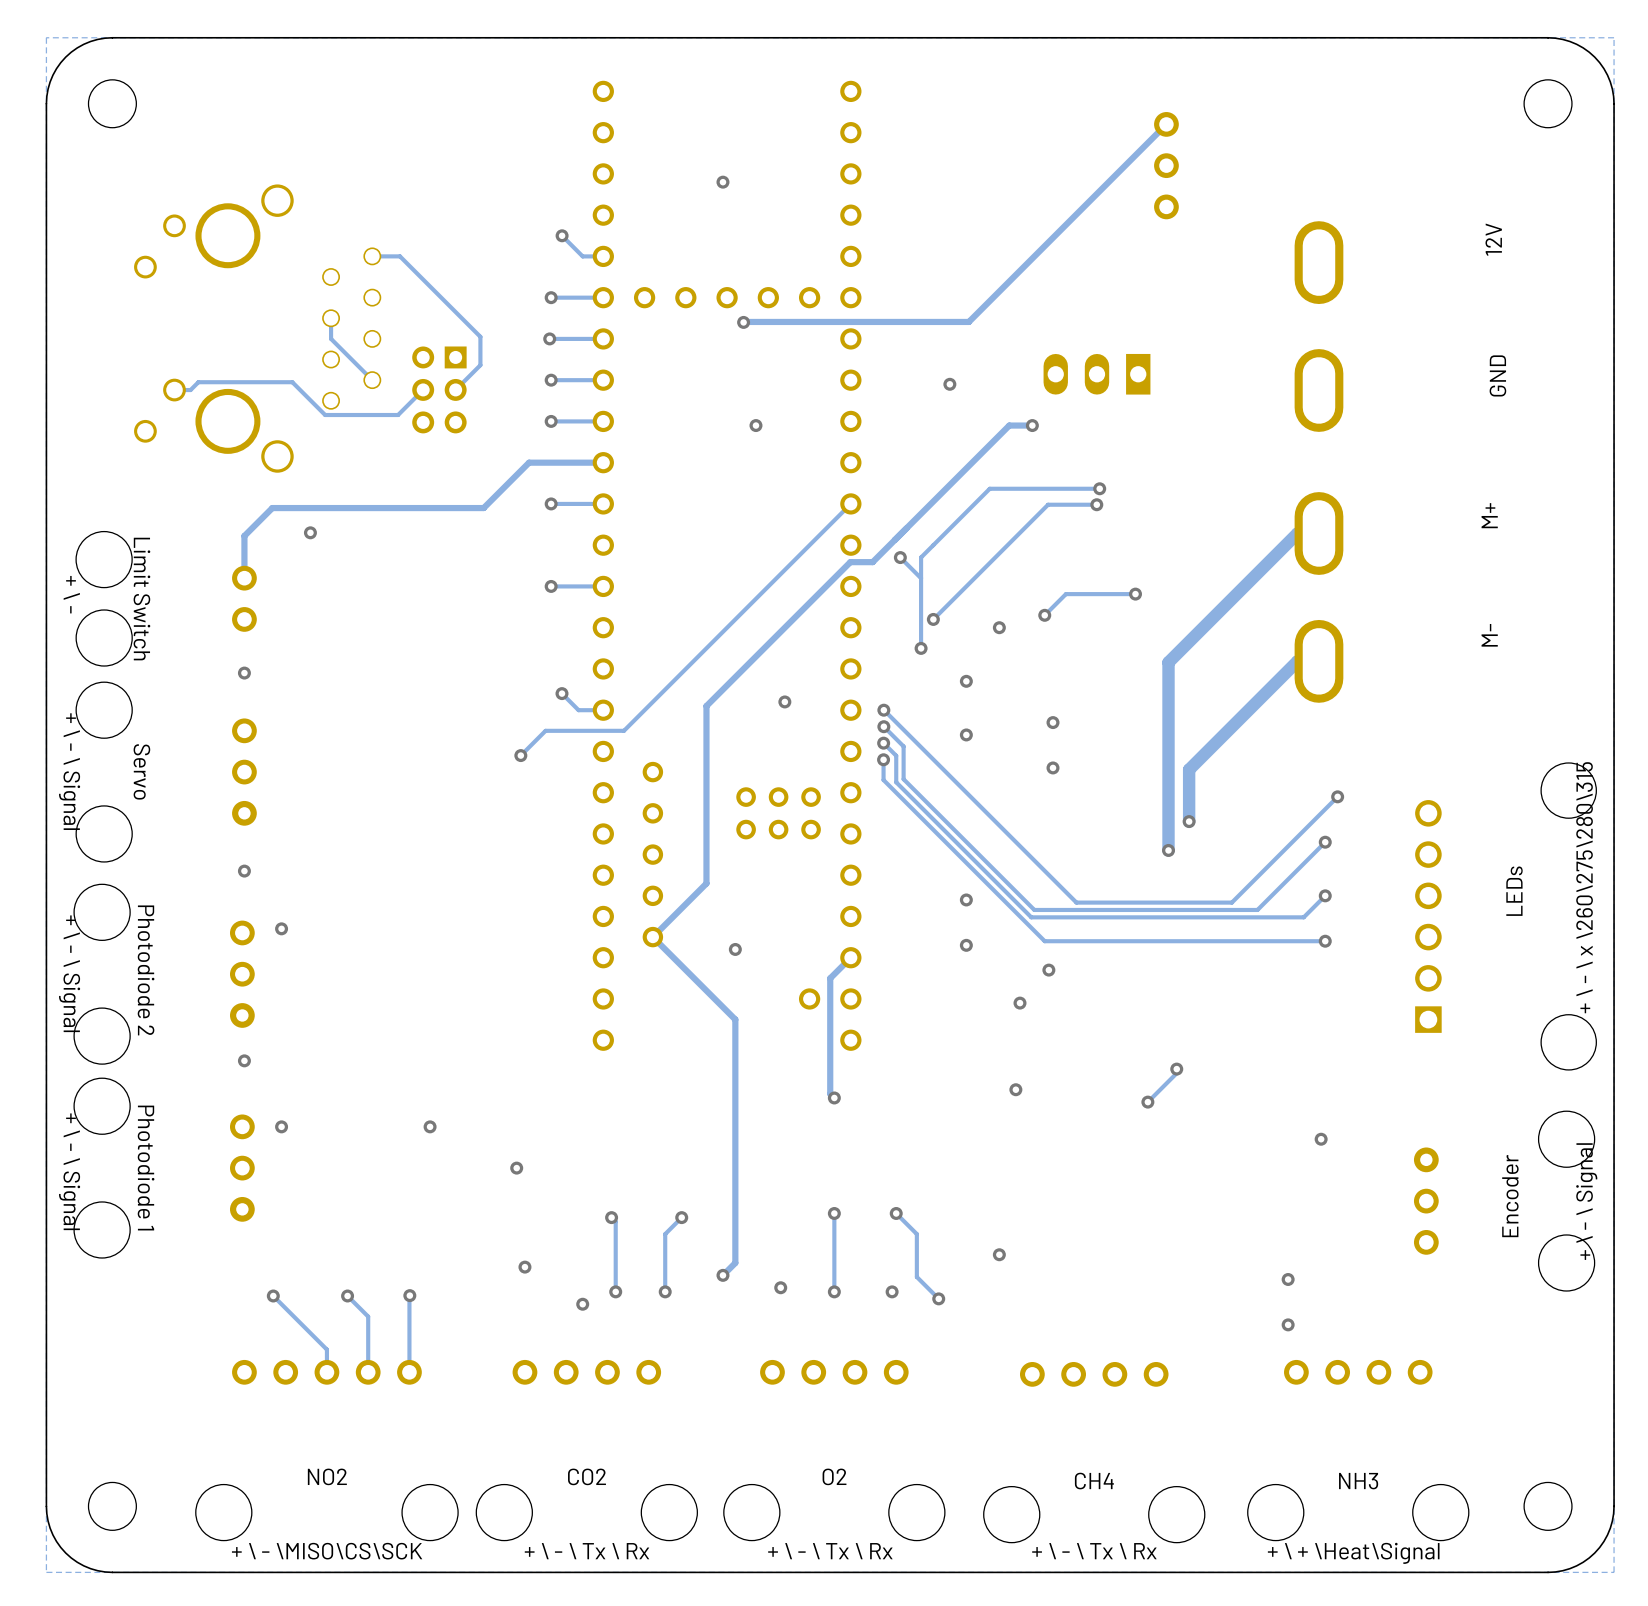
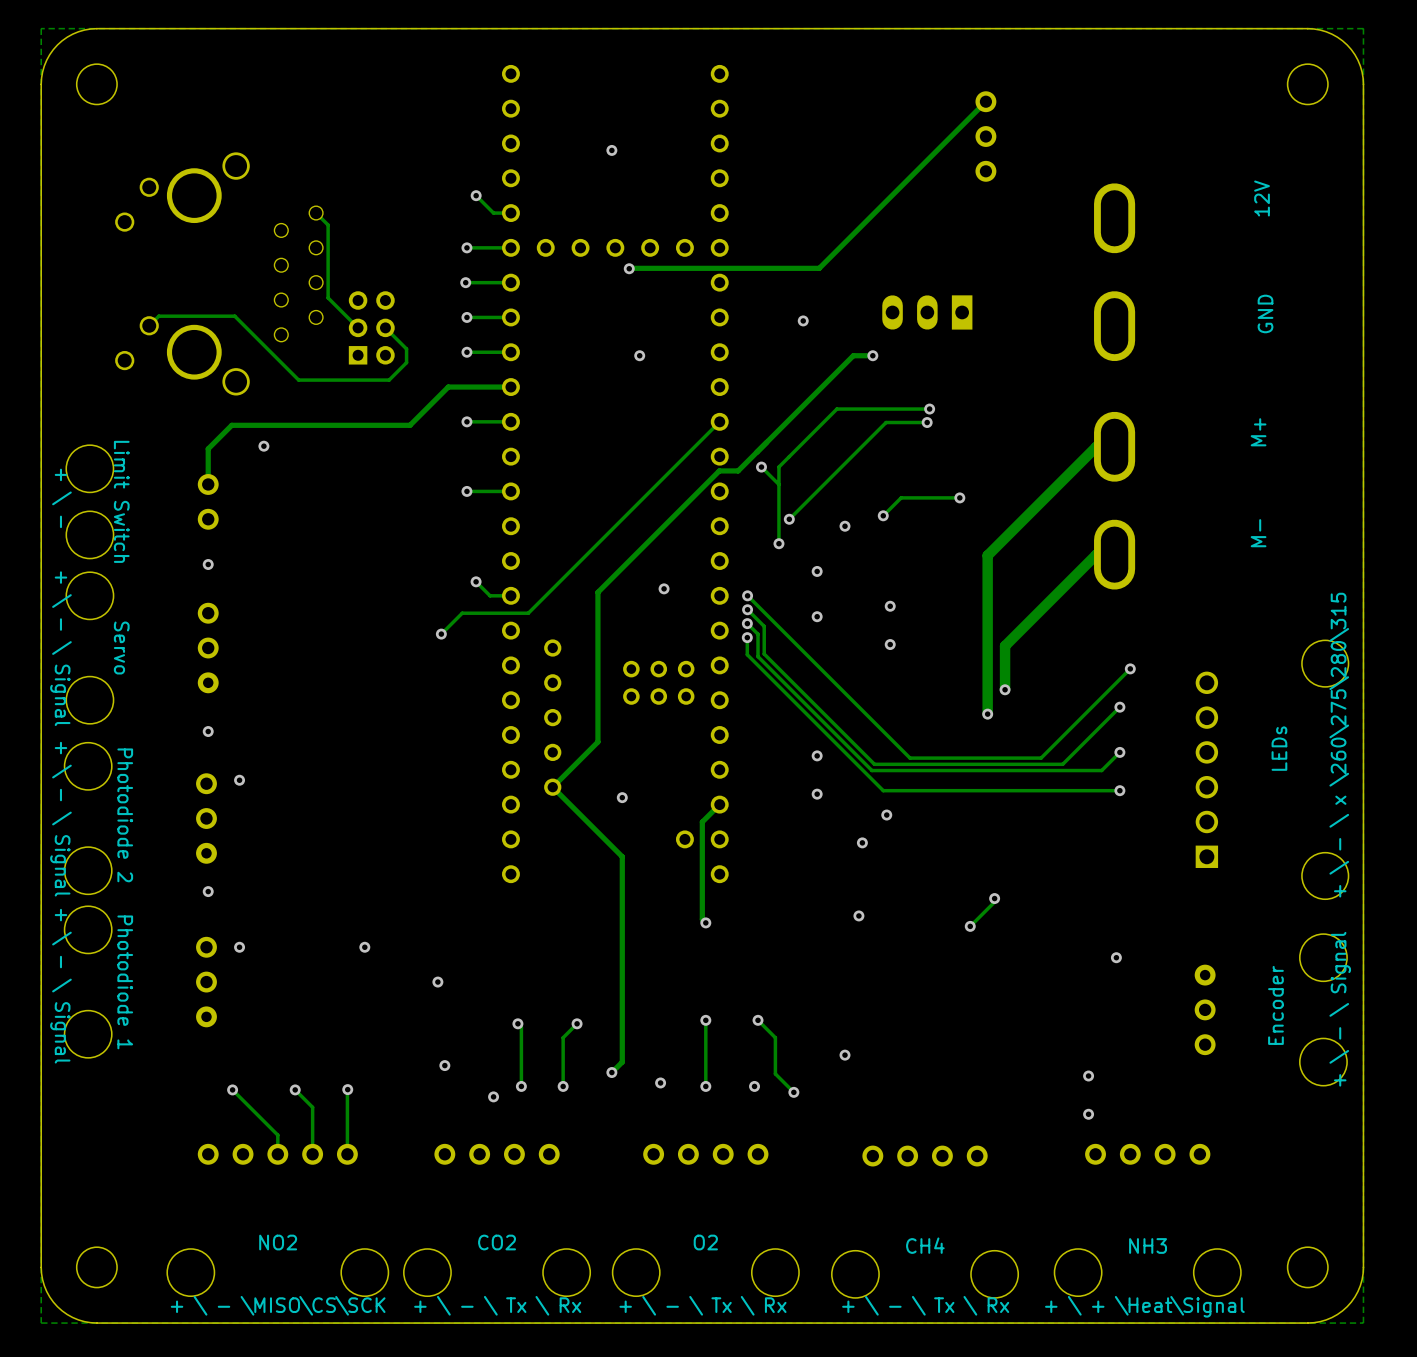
track: (372, 256) (399, 256) (480, 336) (480, 365) (455, 389) -> (316, 213) (328, 225) (328, 297) (358, 327)
track: (331, 318) (331, 338) (372, 380) -> none
track: (423, 389) (398, 415) (325, 415) (292, 382) (198, 382) (190, 390) (174, 390) -> (385, 327) (406, 348) (406, 362) (389, 380) (298, 380) (234, 316) (158, 316) (149, 325)
part rotation: 0° (439, 389) -> 180° (371, 327)

